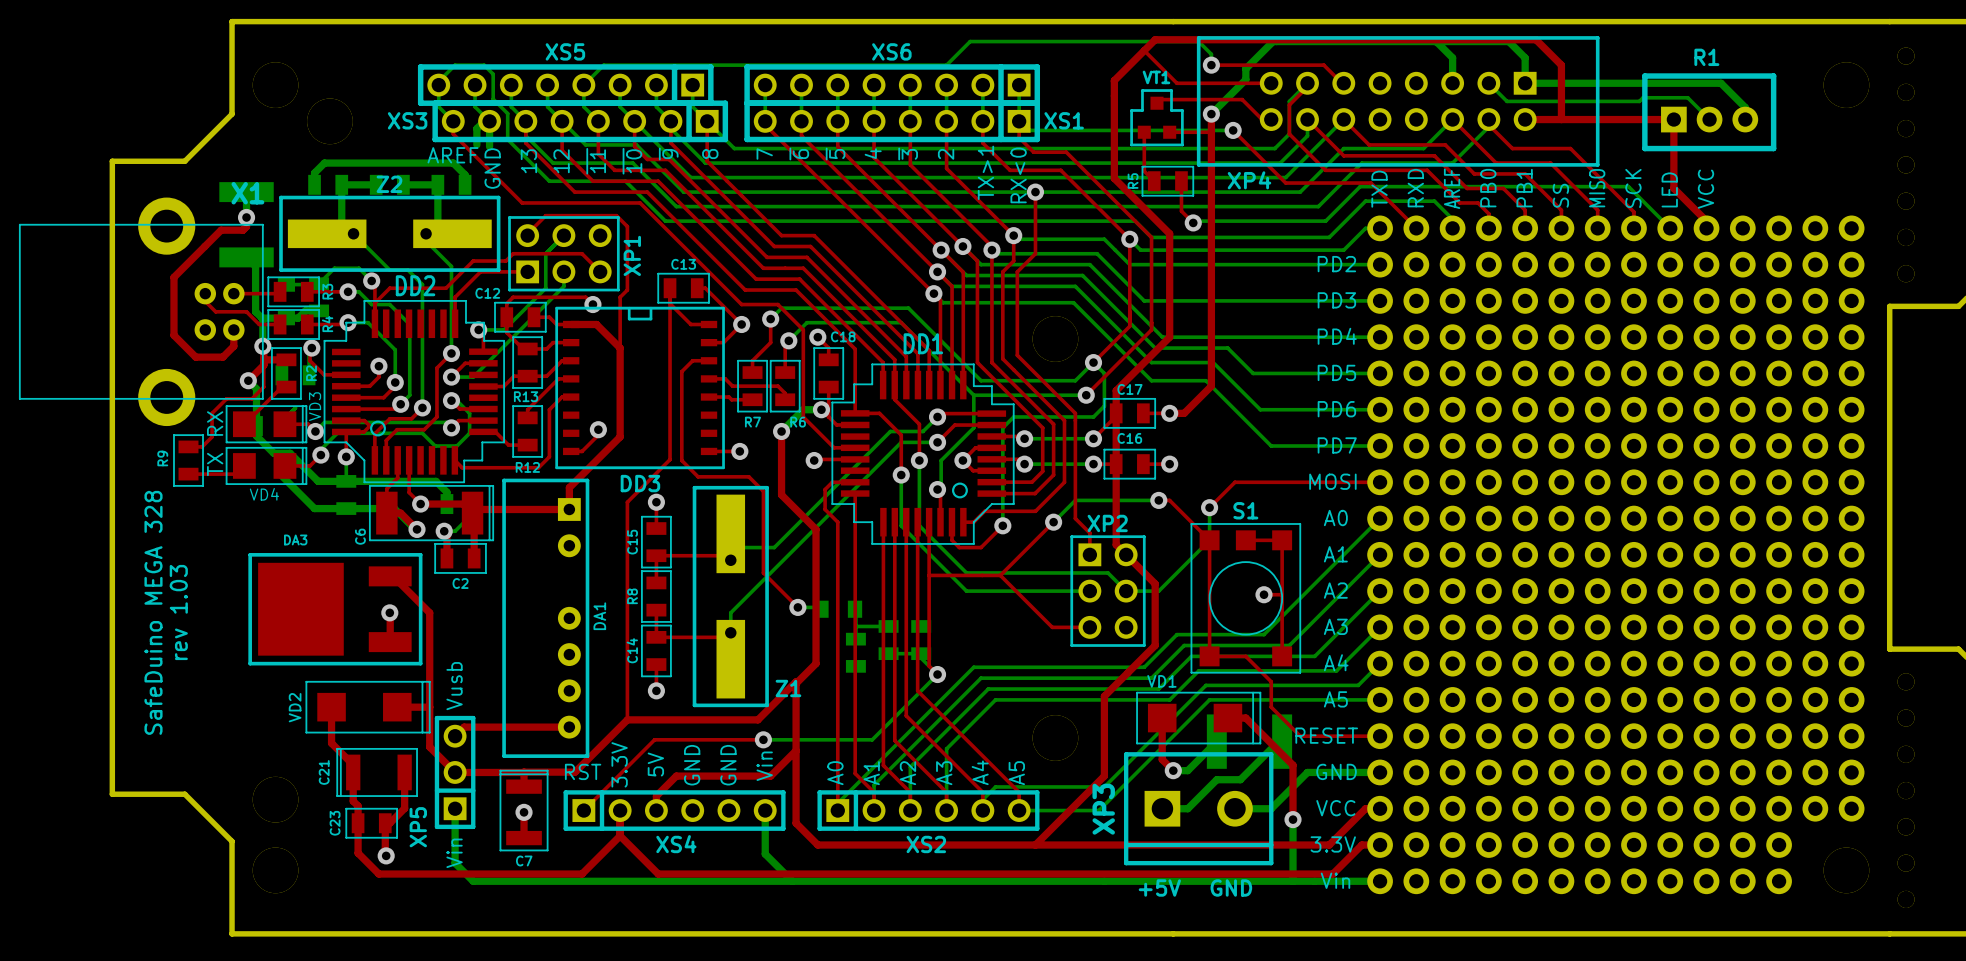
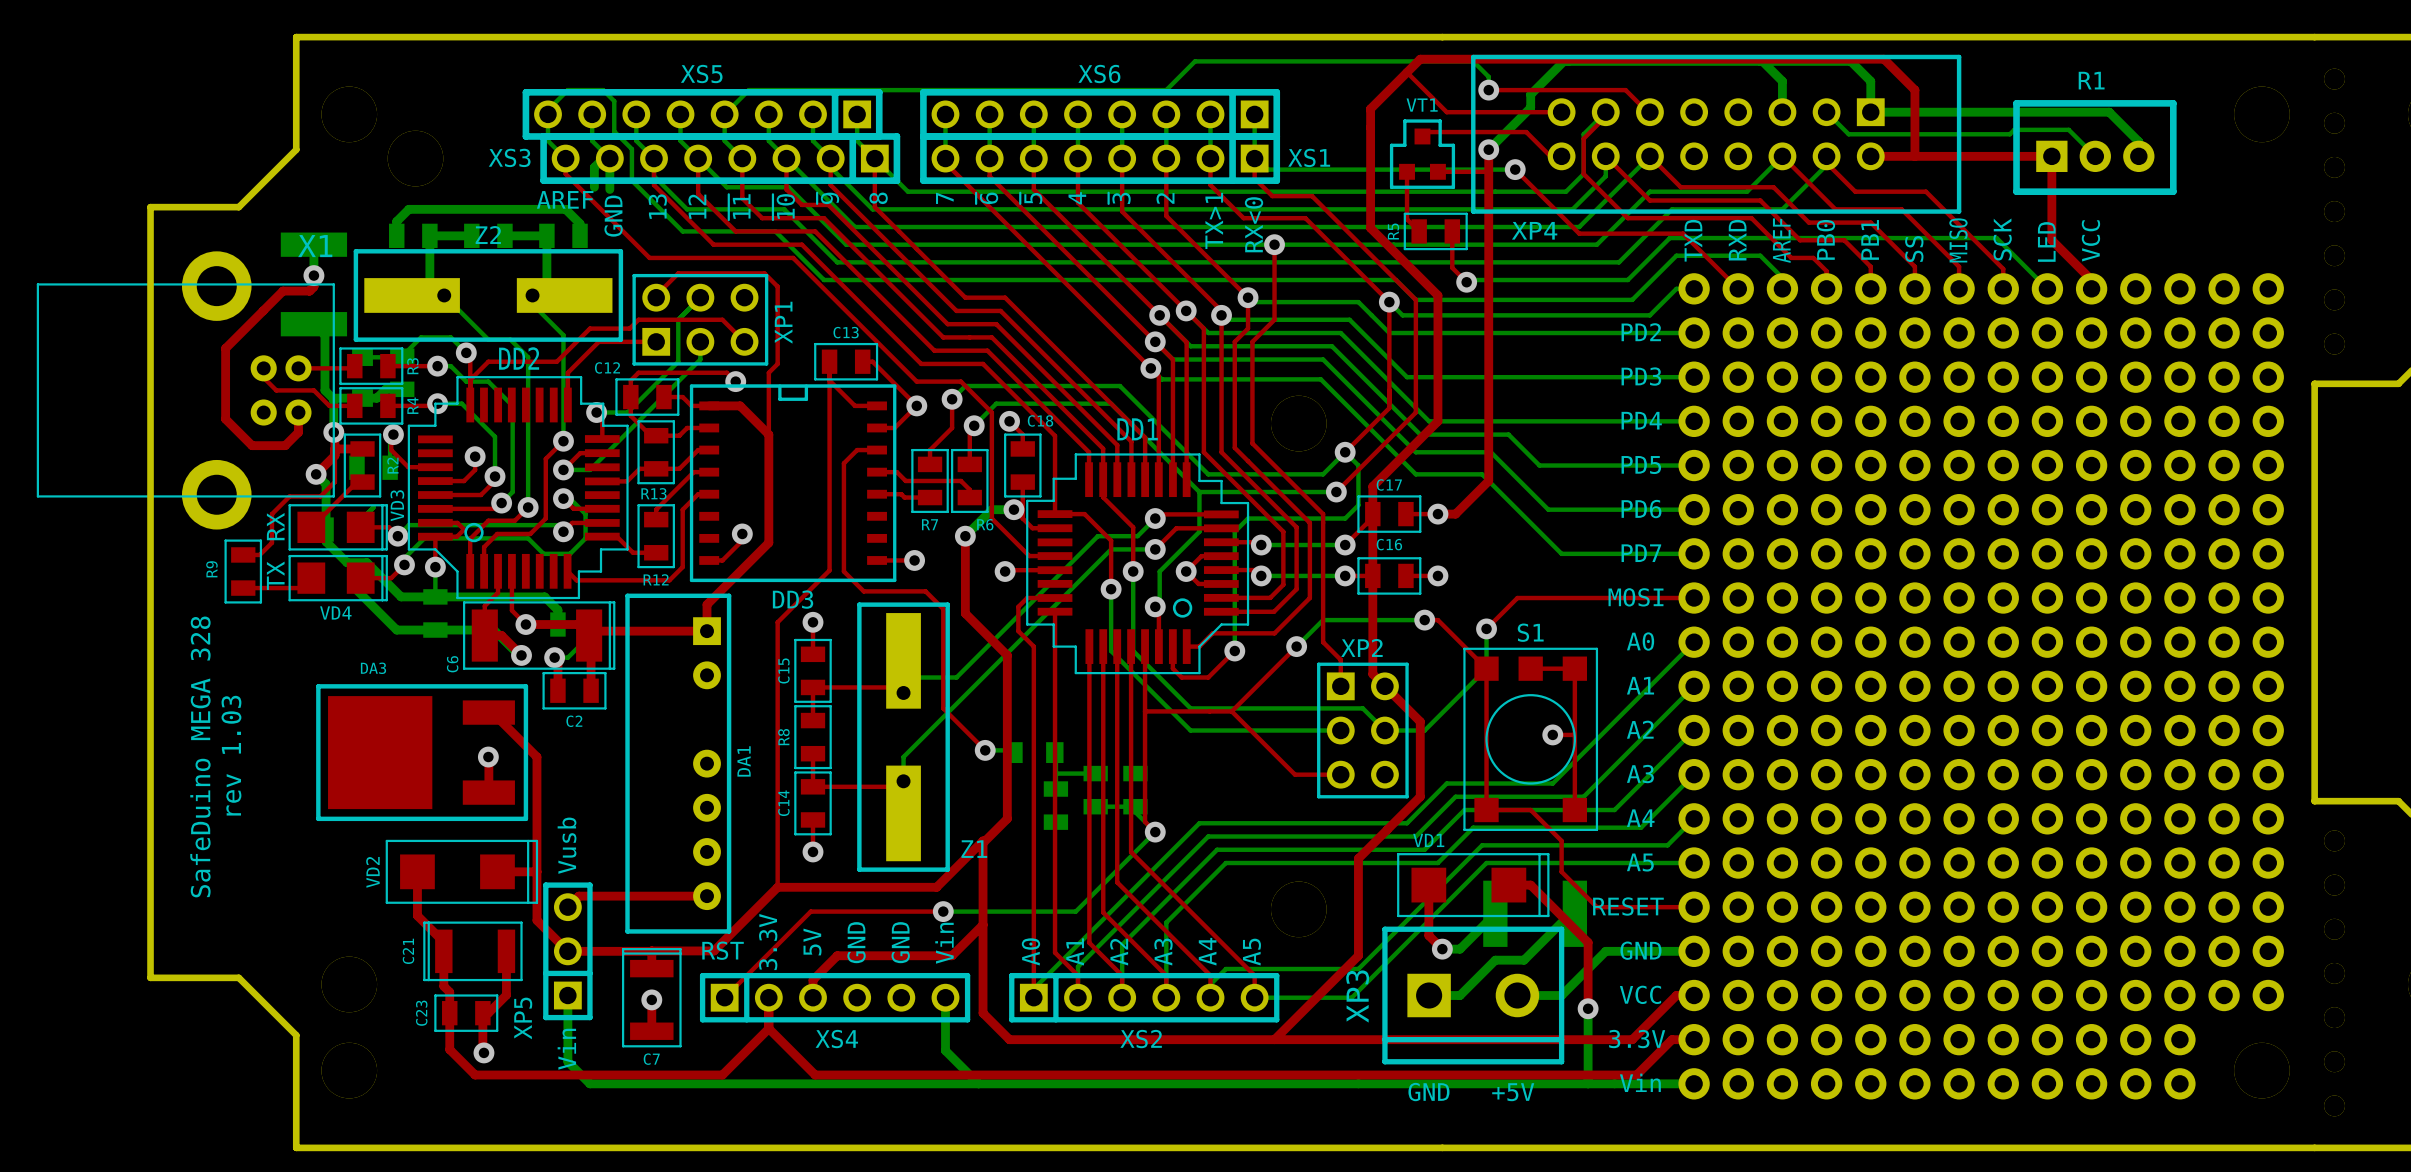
text: +5V (1159, 888) -> GND (1428, 1092)
text: GND (1231, 888) -> +5V (1513, 1092)

